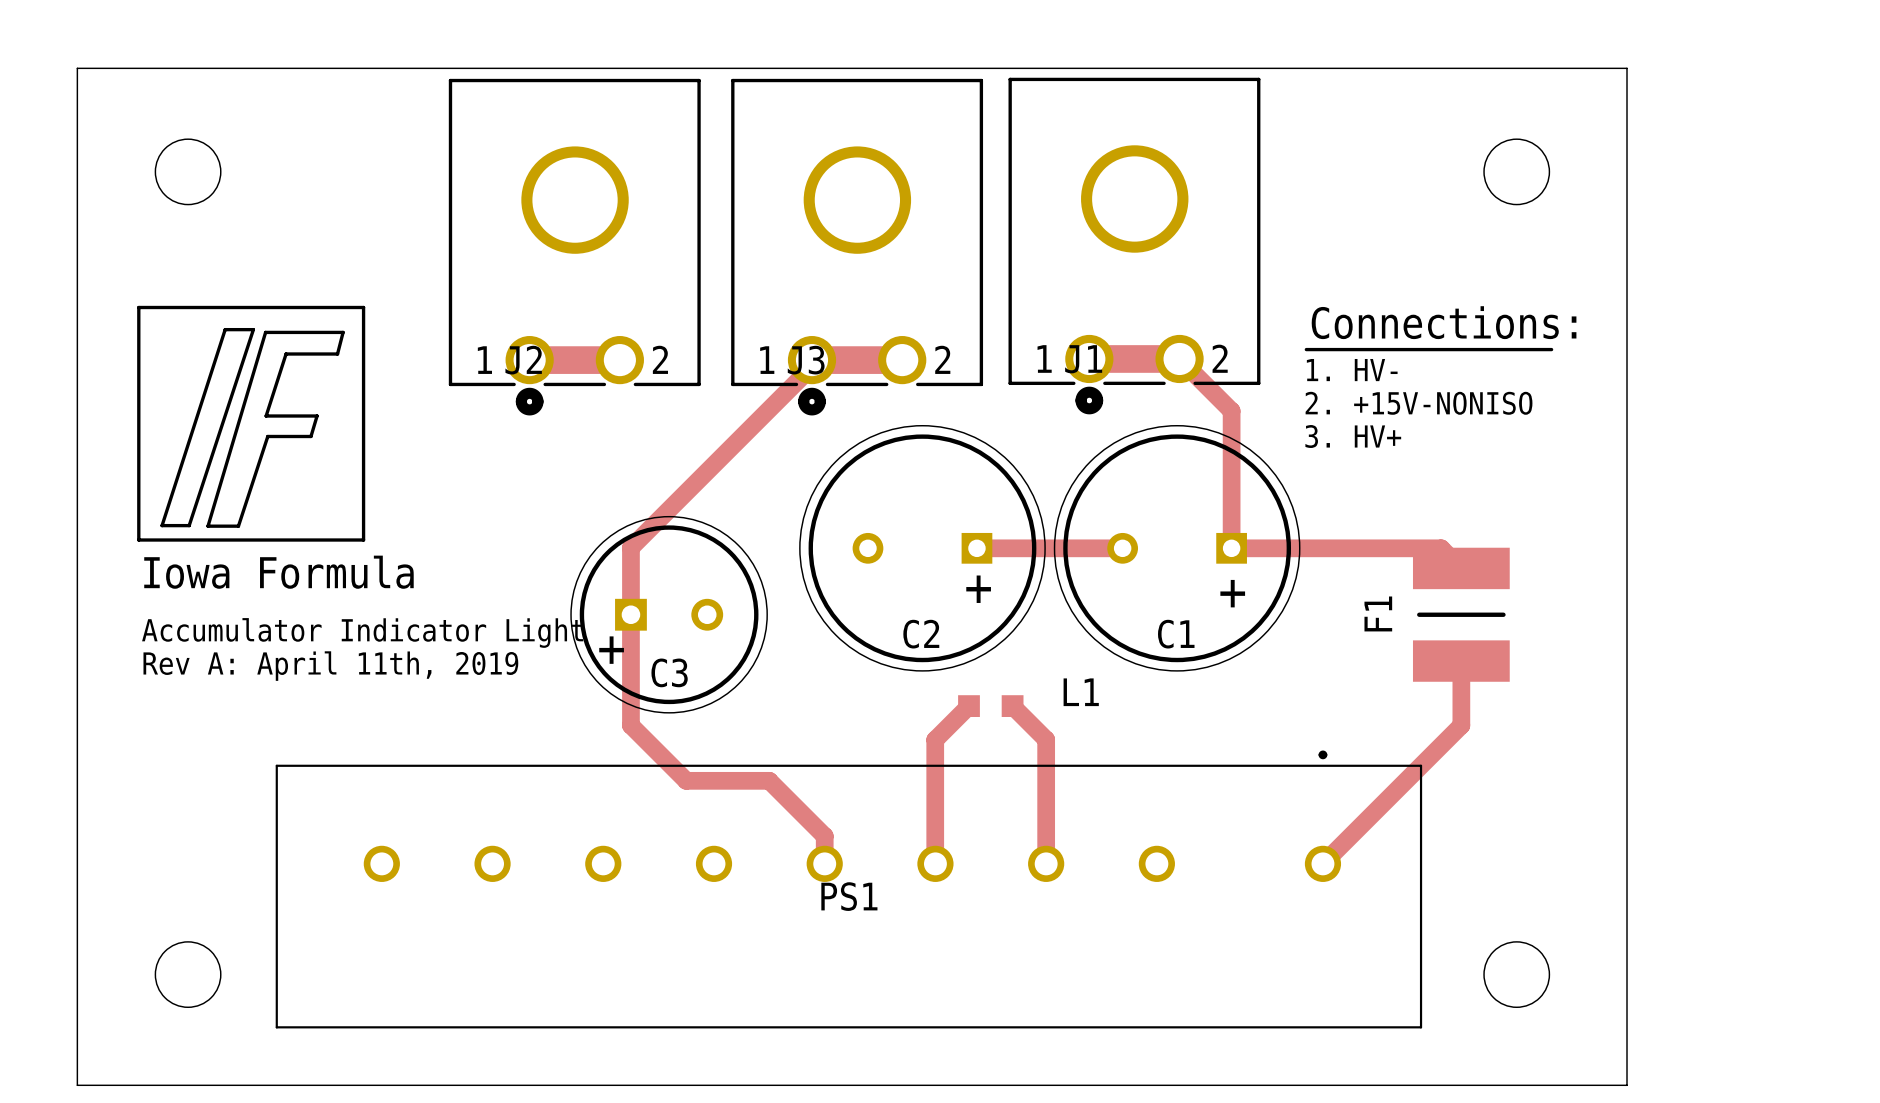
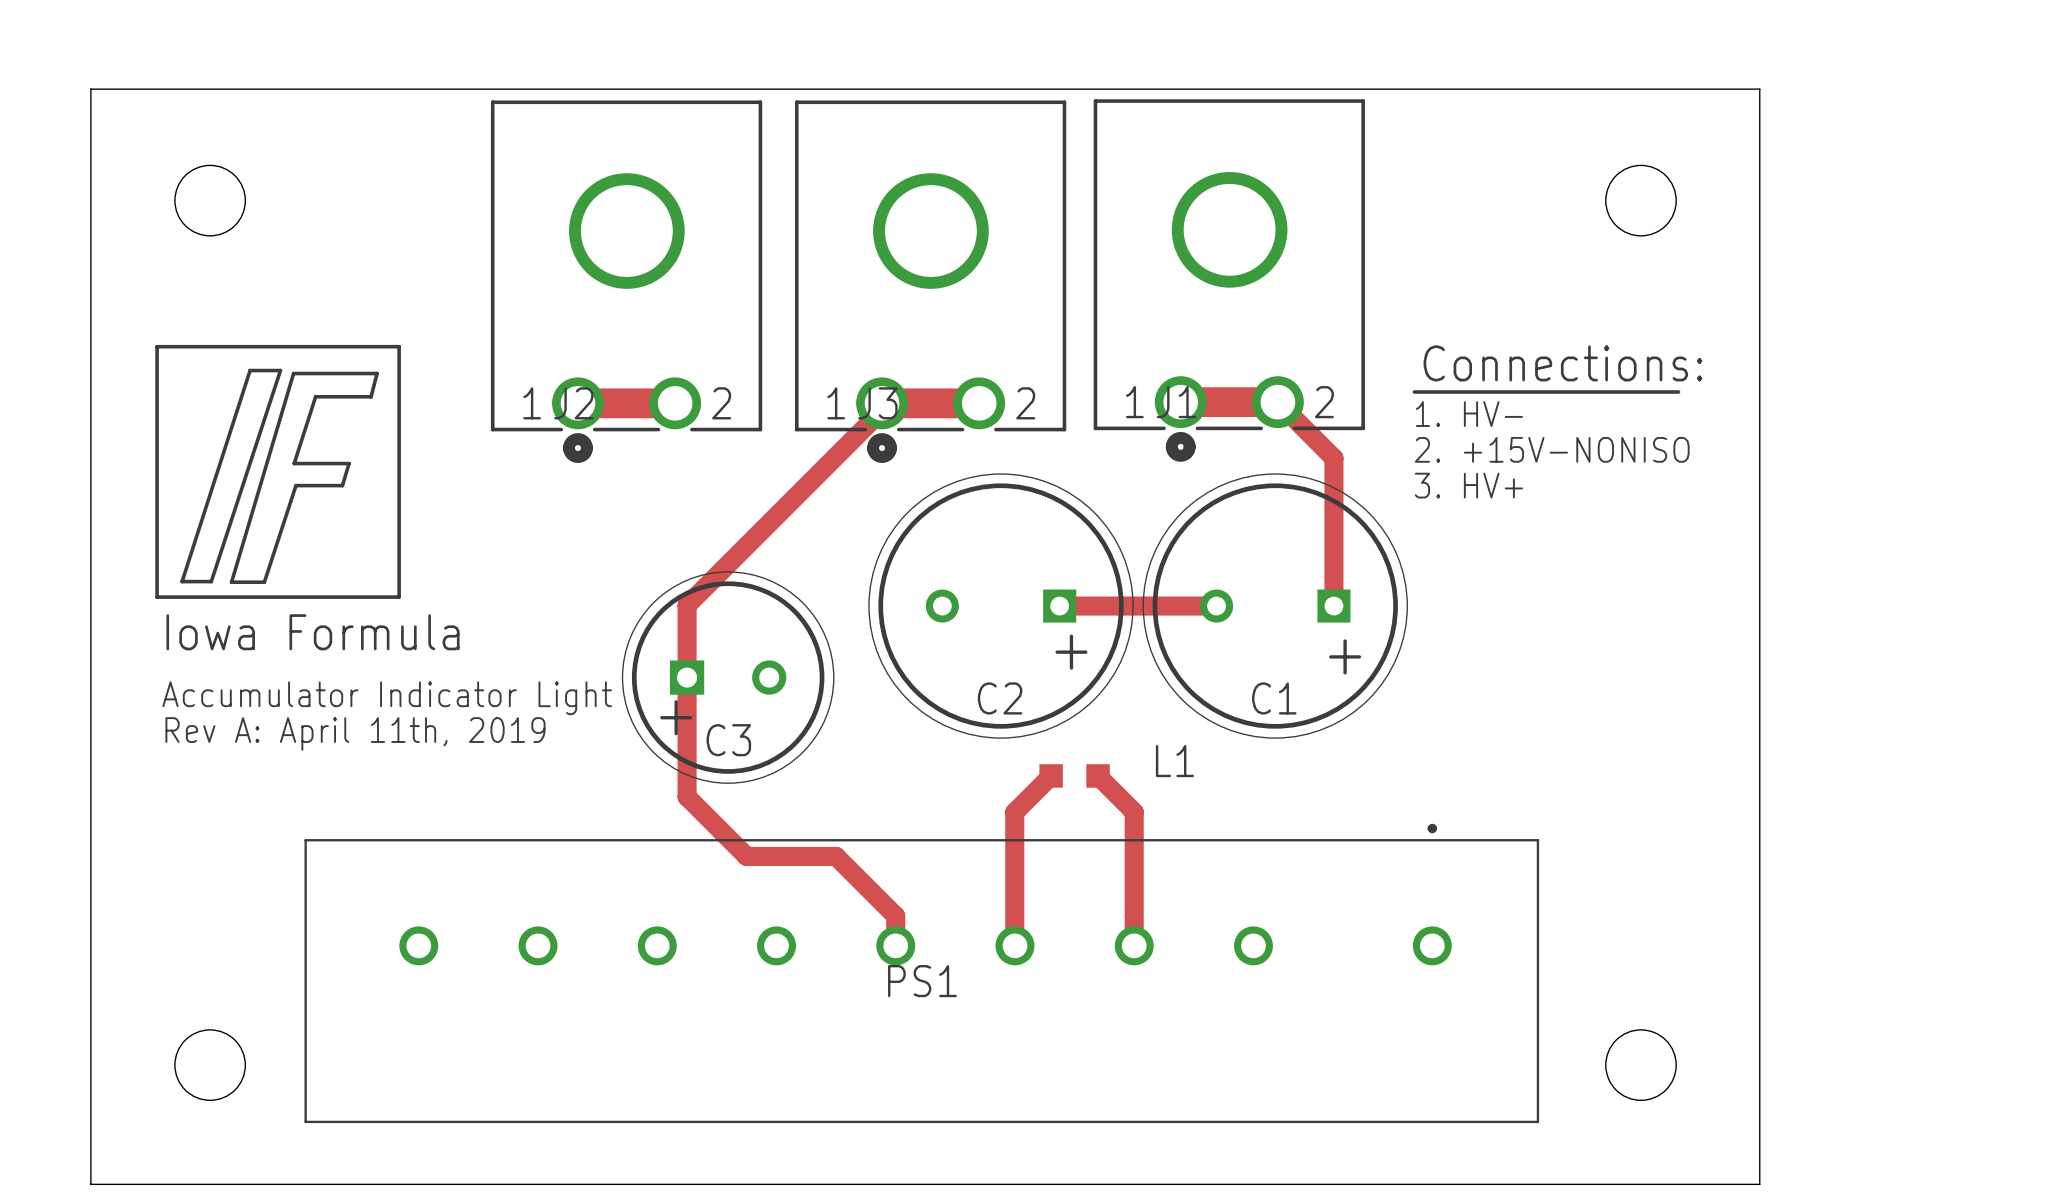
track: (1231, 548) (1441, 548) (1461, 568) -> none
F1: (1461, 614) -> none
track: (1461, 661) (1461, 725) (1322, 863) -> none

